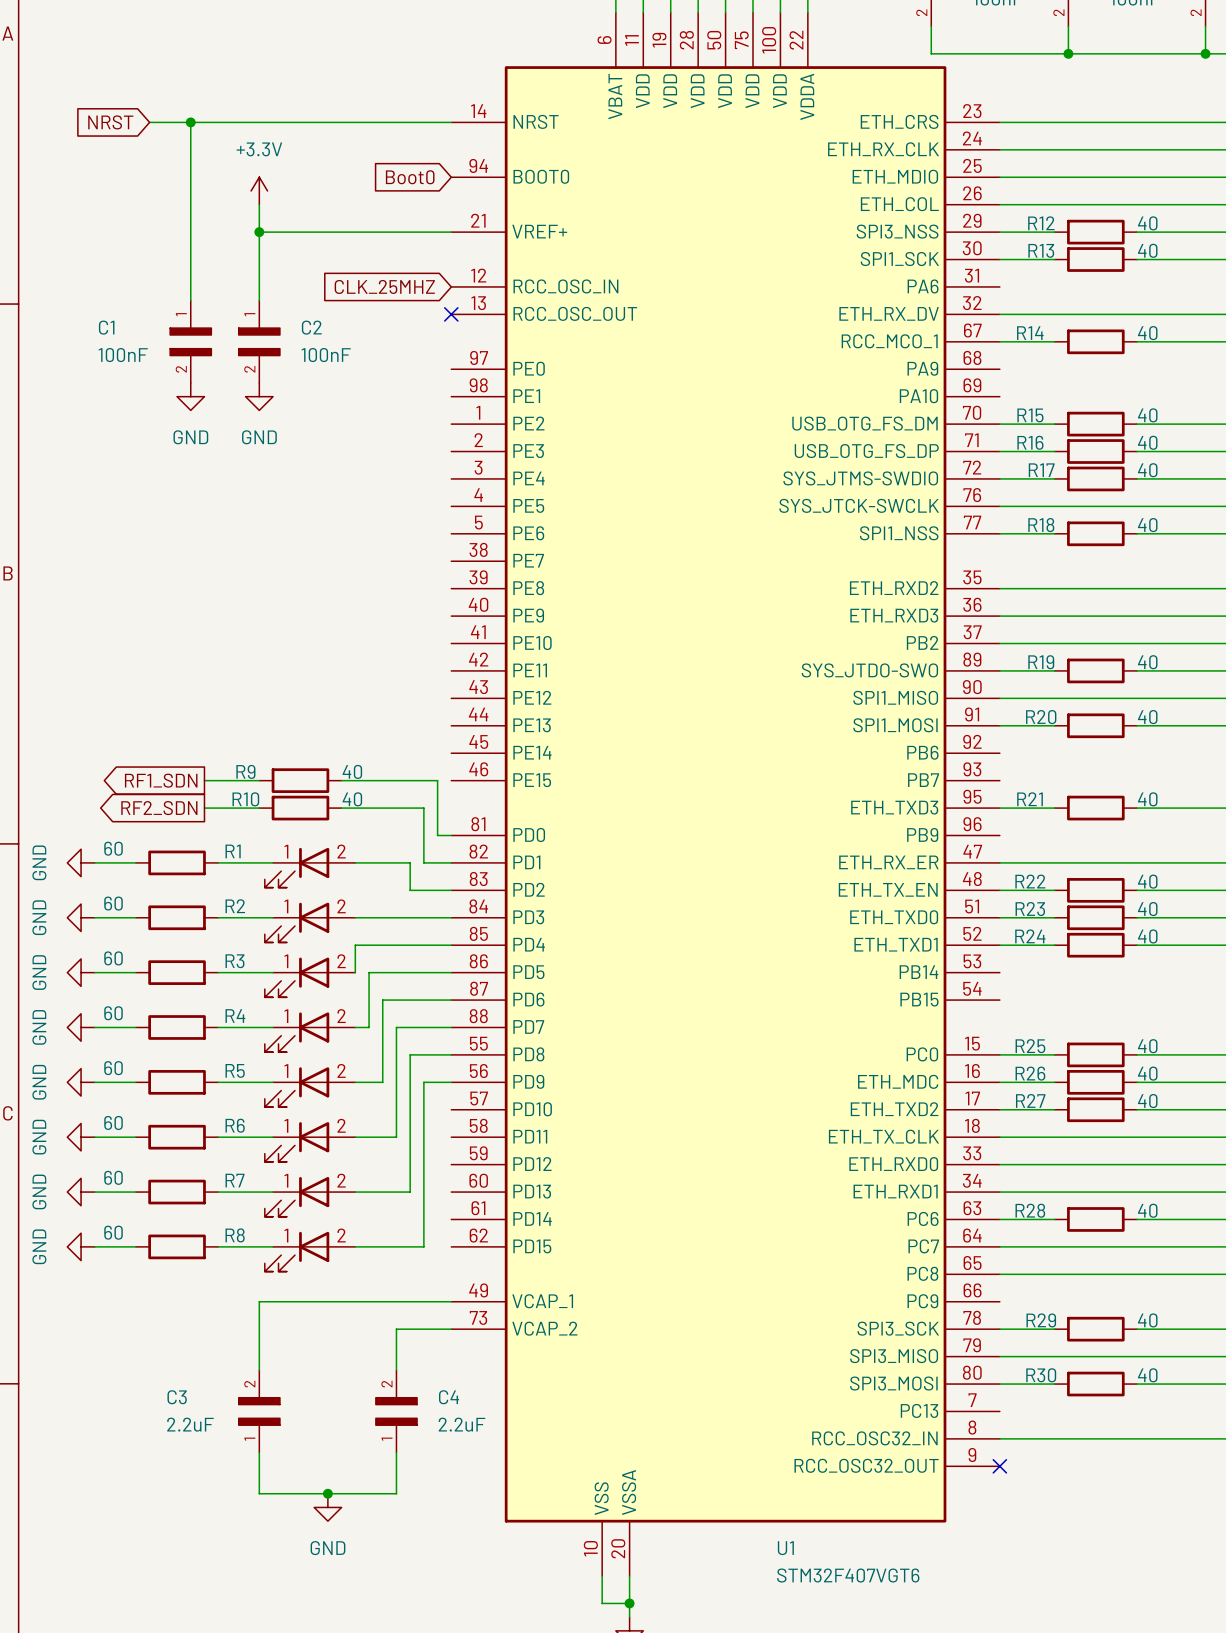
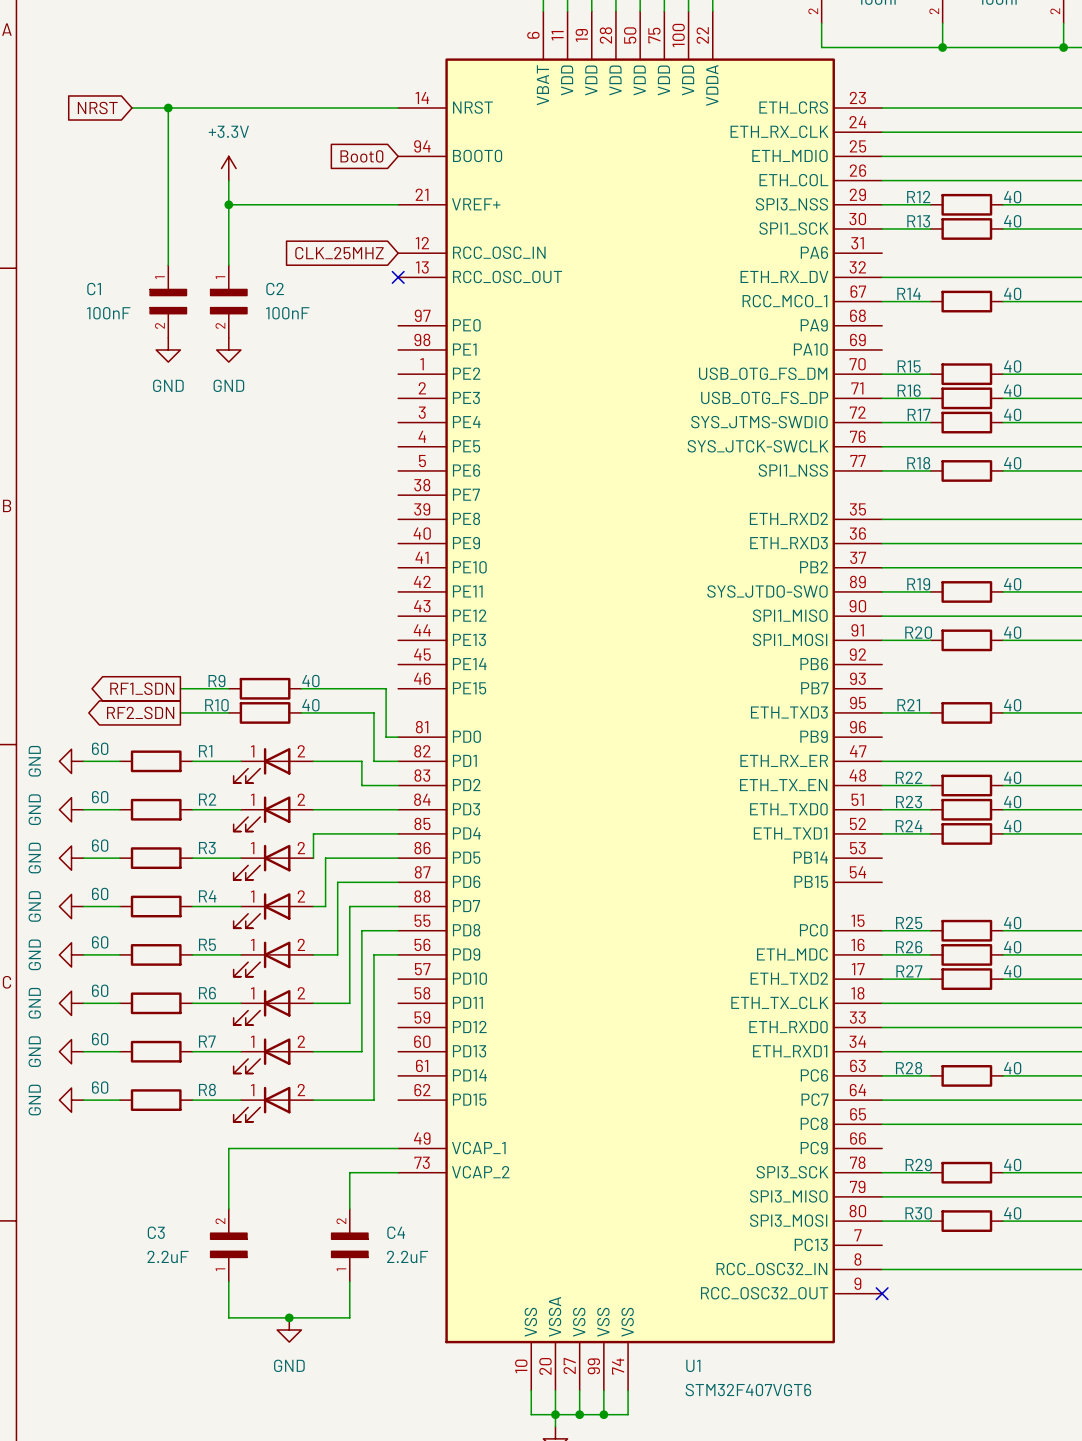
U1 symbol: [451, 12, 1000, 1577] -> [398, 11, 883, 1391]
wire: none -> (579, 1390) (579, 1414)
wire: none -> (603, 1390) (603, 1414)
wire: none -> (628, 1390) (628, 1414) (555, 1414)
junction: none -> (579, 1414)
junction: none -> (603, 1414)

